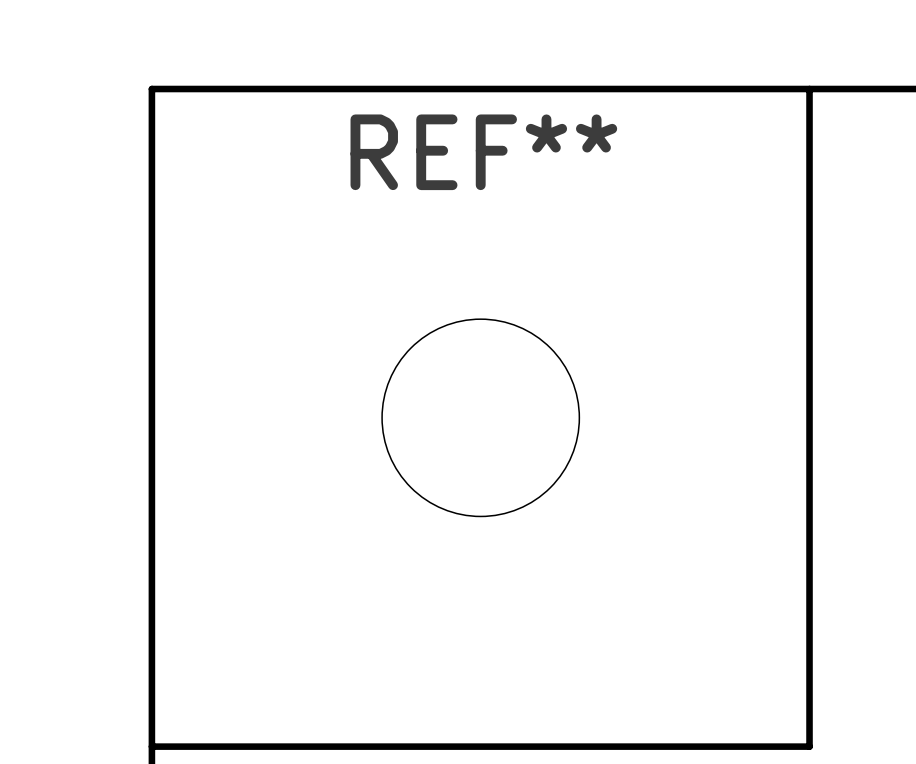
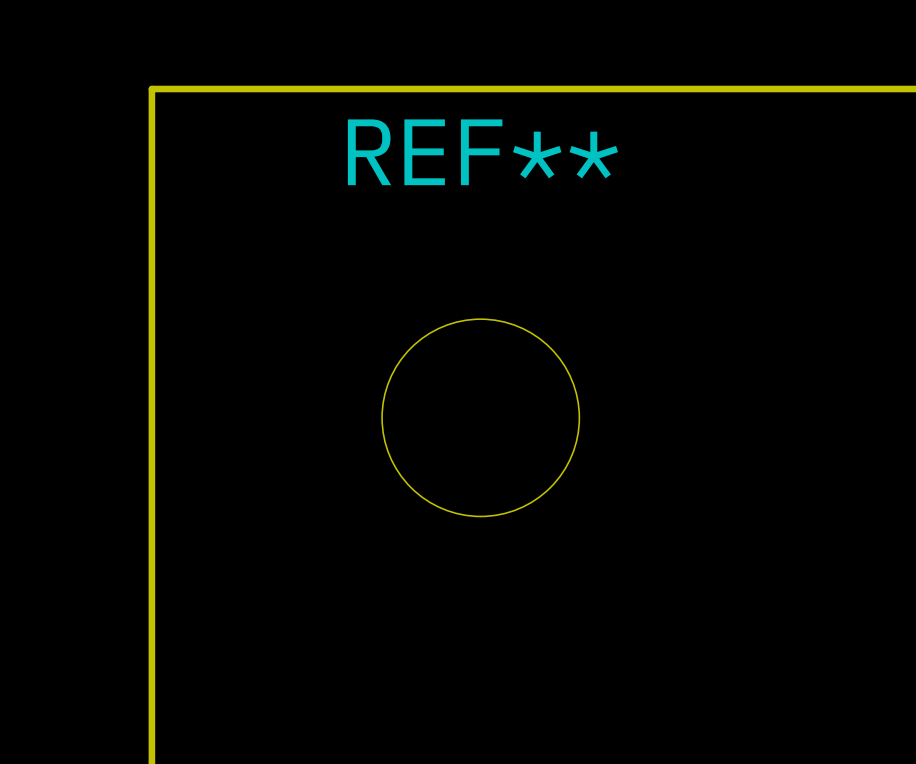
board edge: (809, 89) (809, 746) (151, 746) -> none

